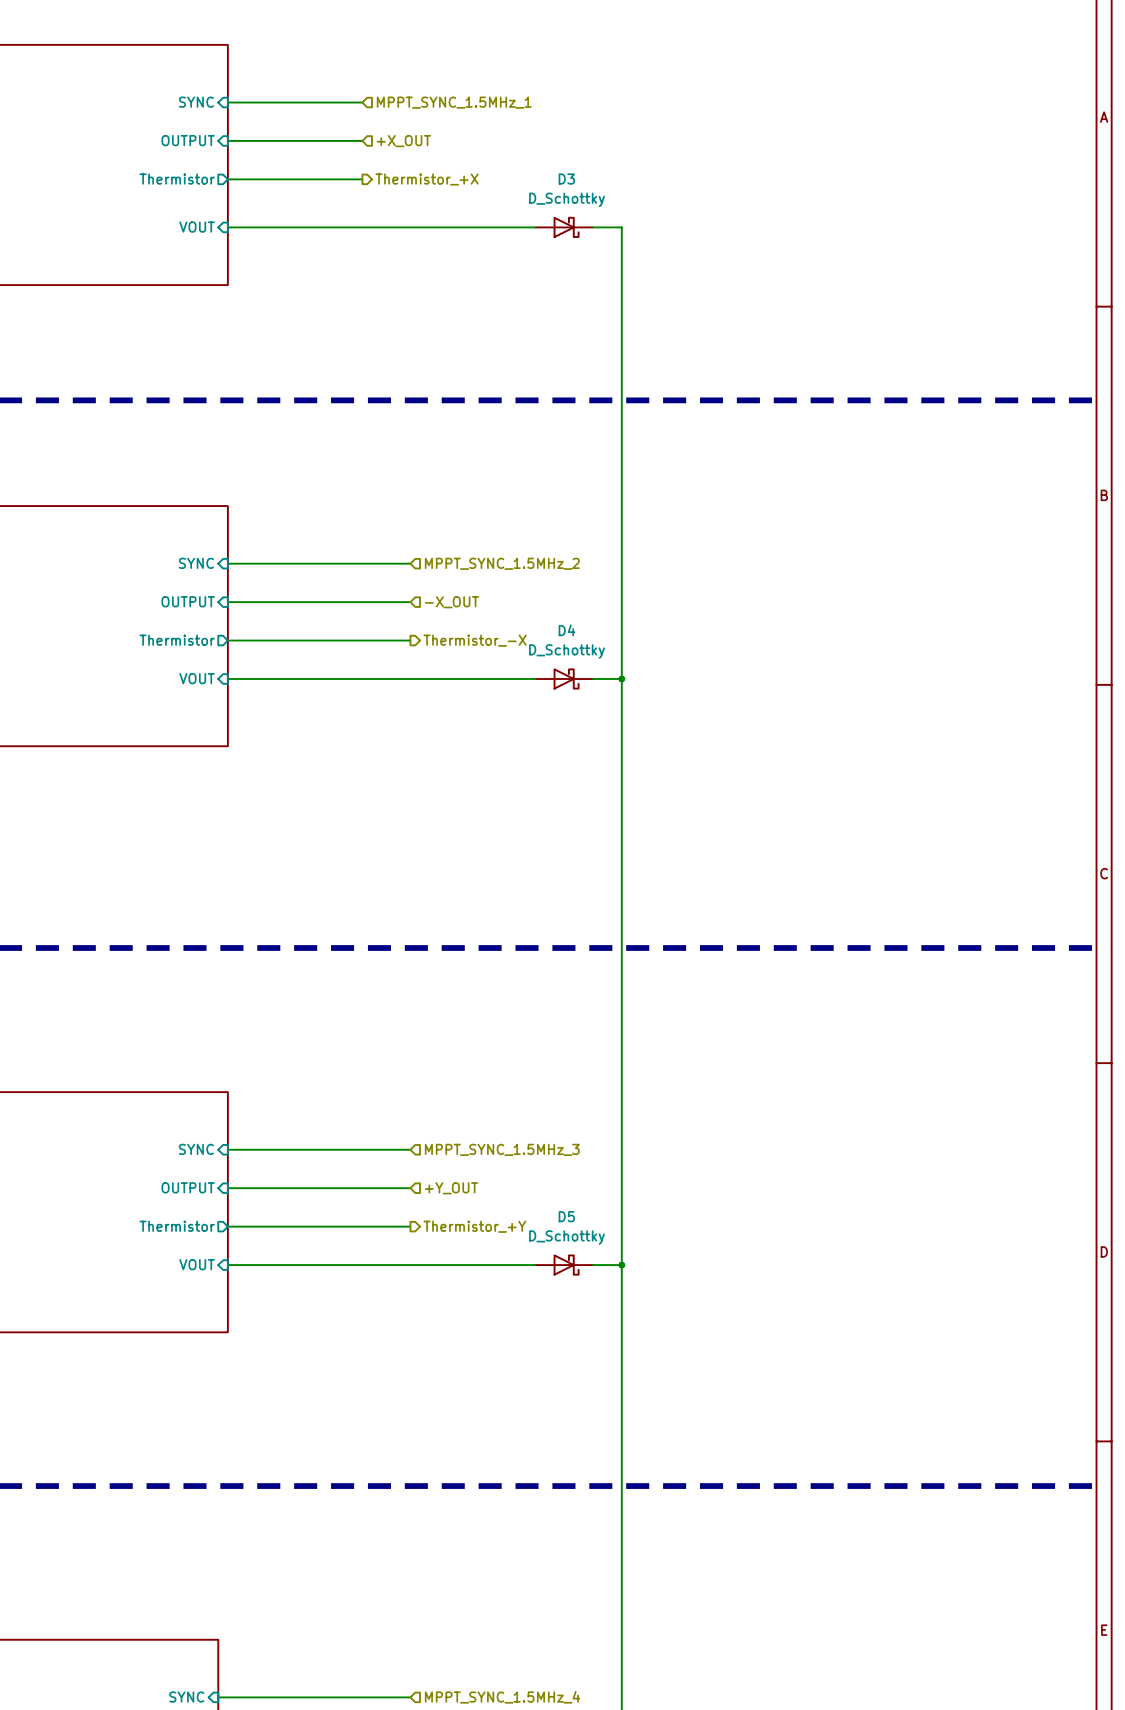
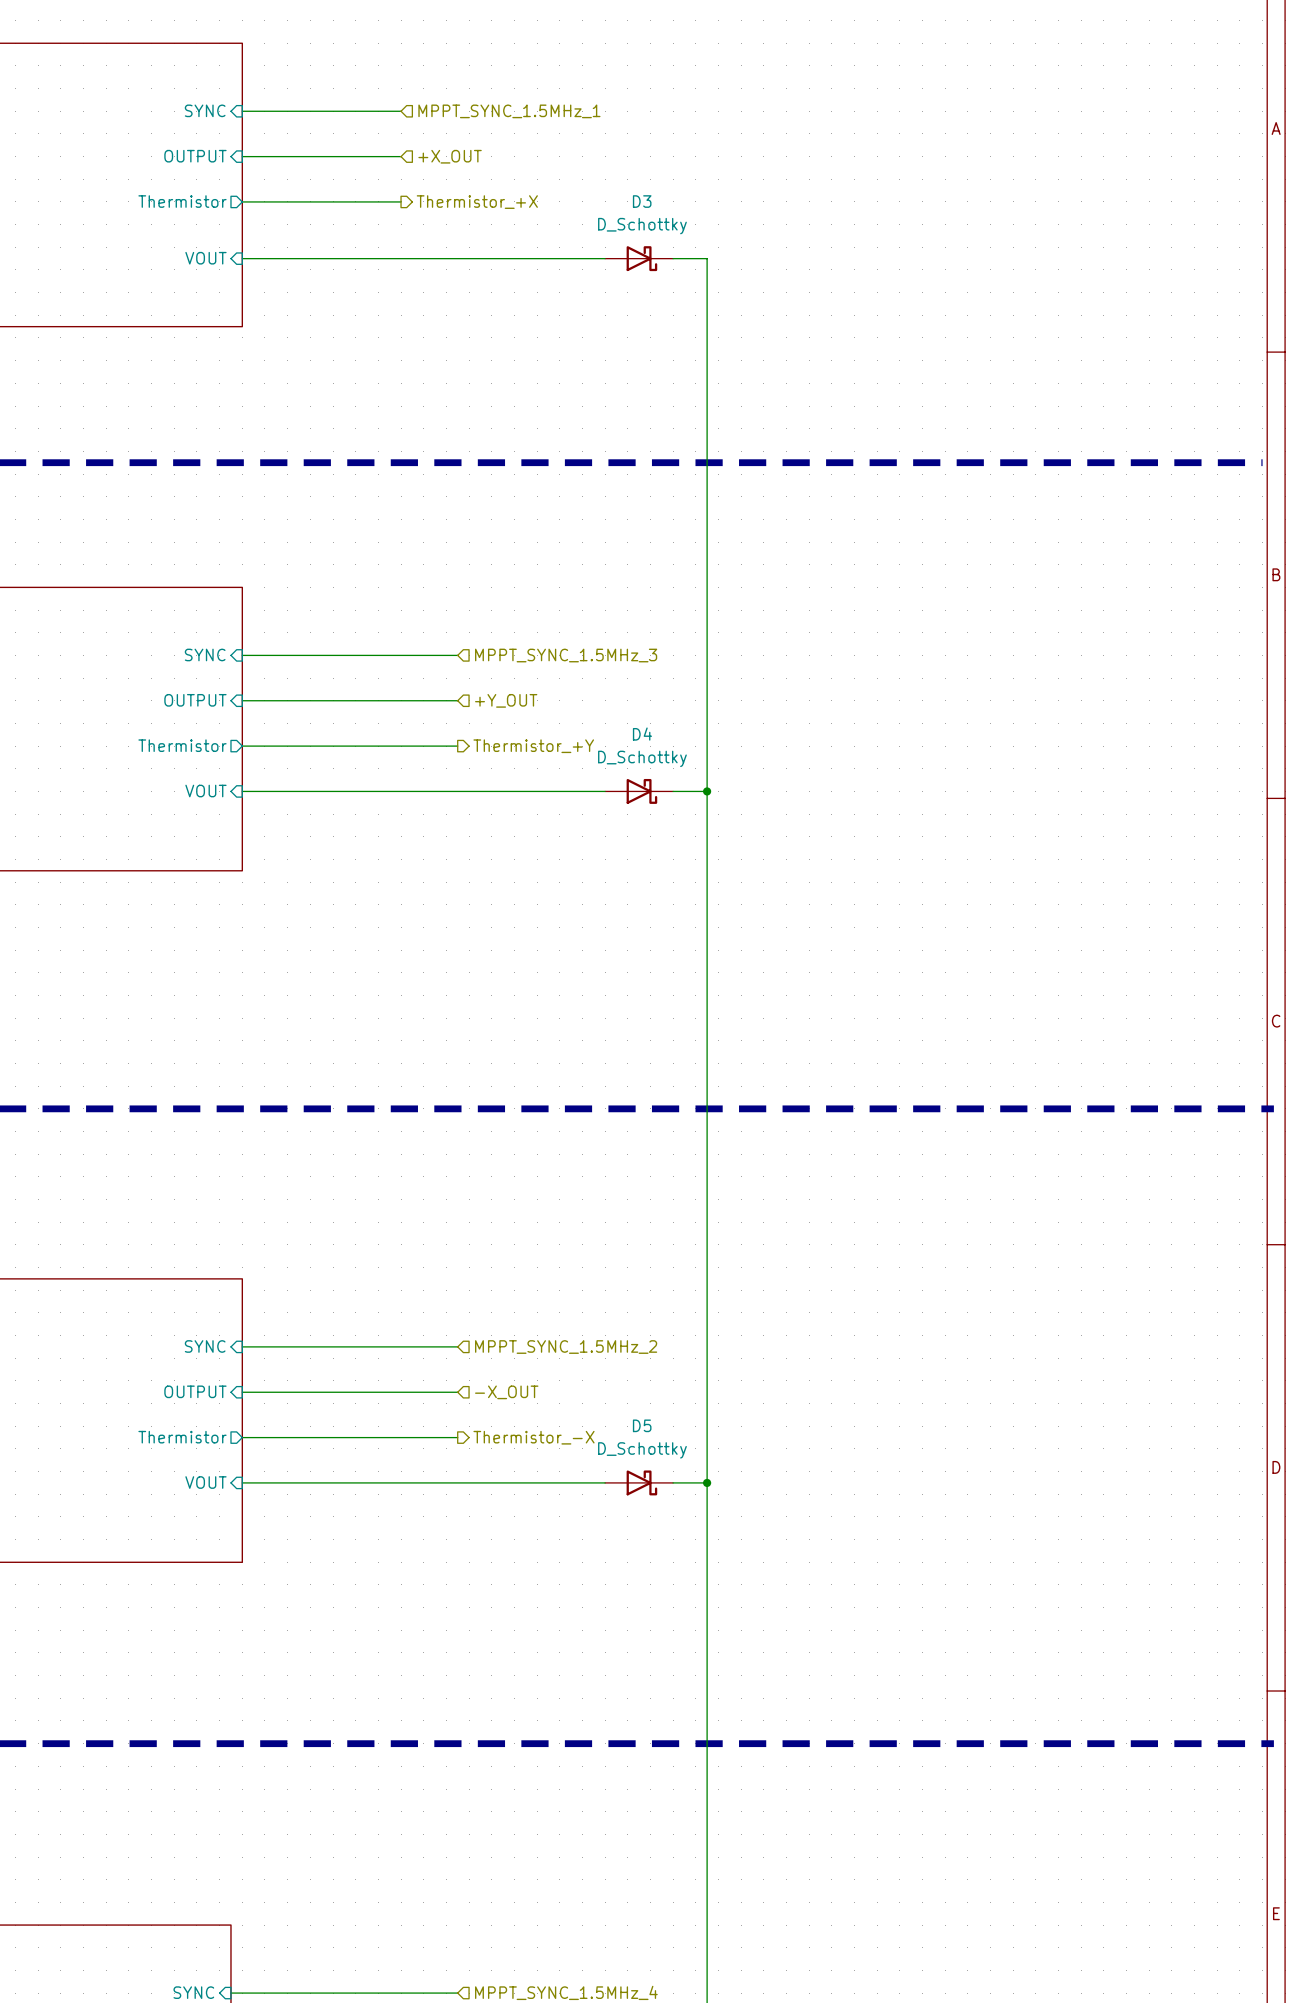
hierarchical label: MPPT_SYNC_1.5MHz_2 (502, 563) -> MPPT_SYNC_1.5MHz_3 (566, 655)
hierarchical label: -X_OUT (451, 602) -> +Y_OUT (506, 700)
hierarchical label: Thermistor_-X (475, 640) -> Thermistor_+Y (533, 746)
hierarchical label: MPPT_SYNC_1.5MHz_3 (502, 1149) -> MPPT_SYNC_1.5MHz_2 (566, 1347)
hierarchical label: +Y_OUT (451, 1188) -> -X_OUT (506, 1392)
hierarchical label: Thermistor_+Y (474, 1226) -> Thermistor_-X (533, 1437)

